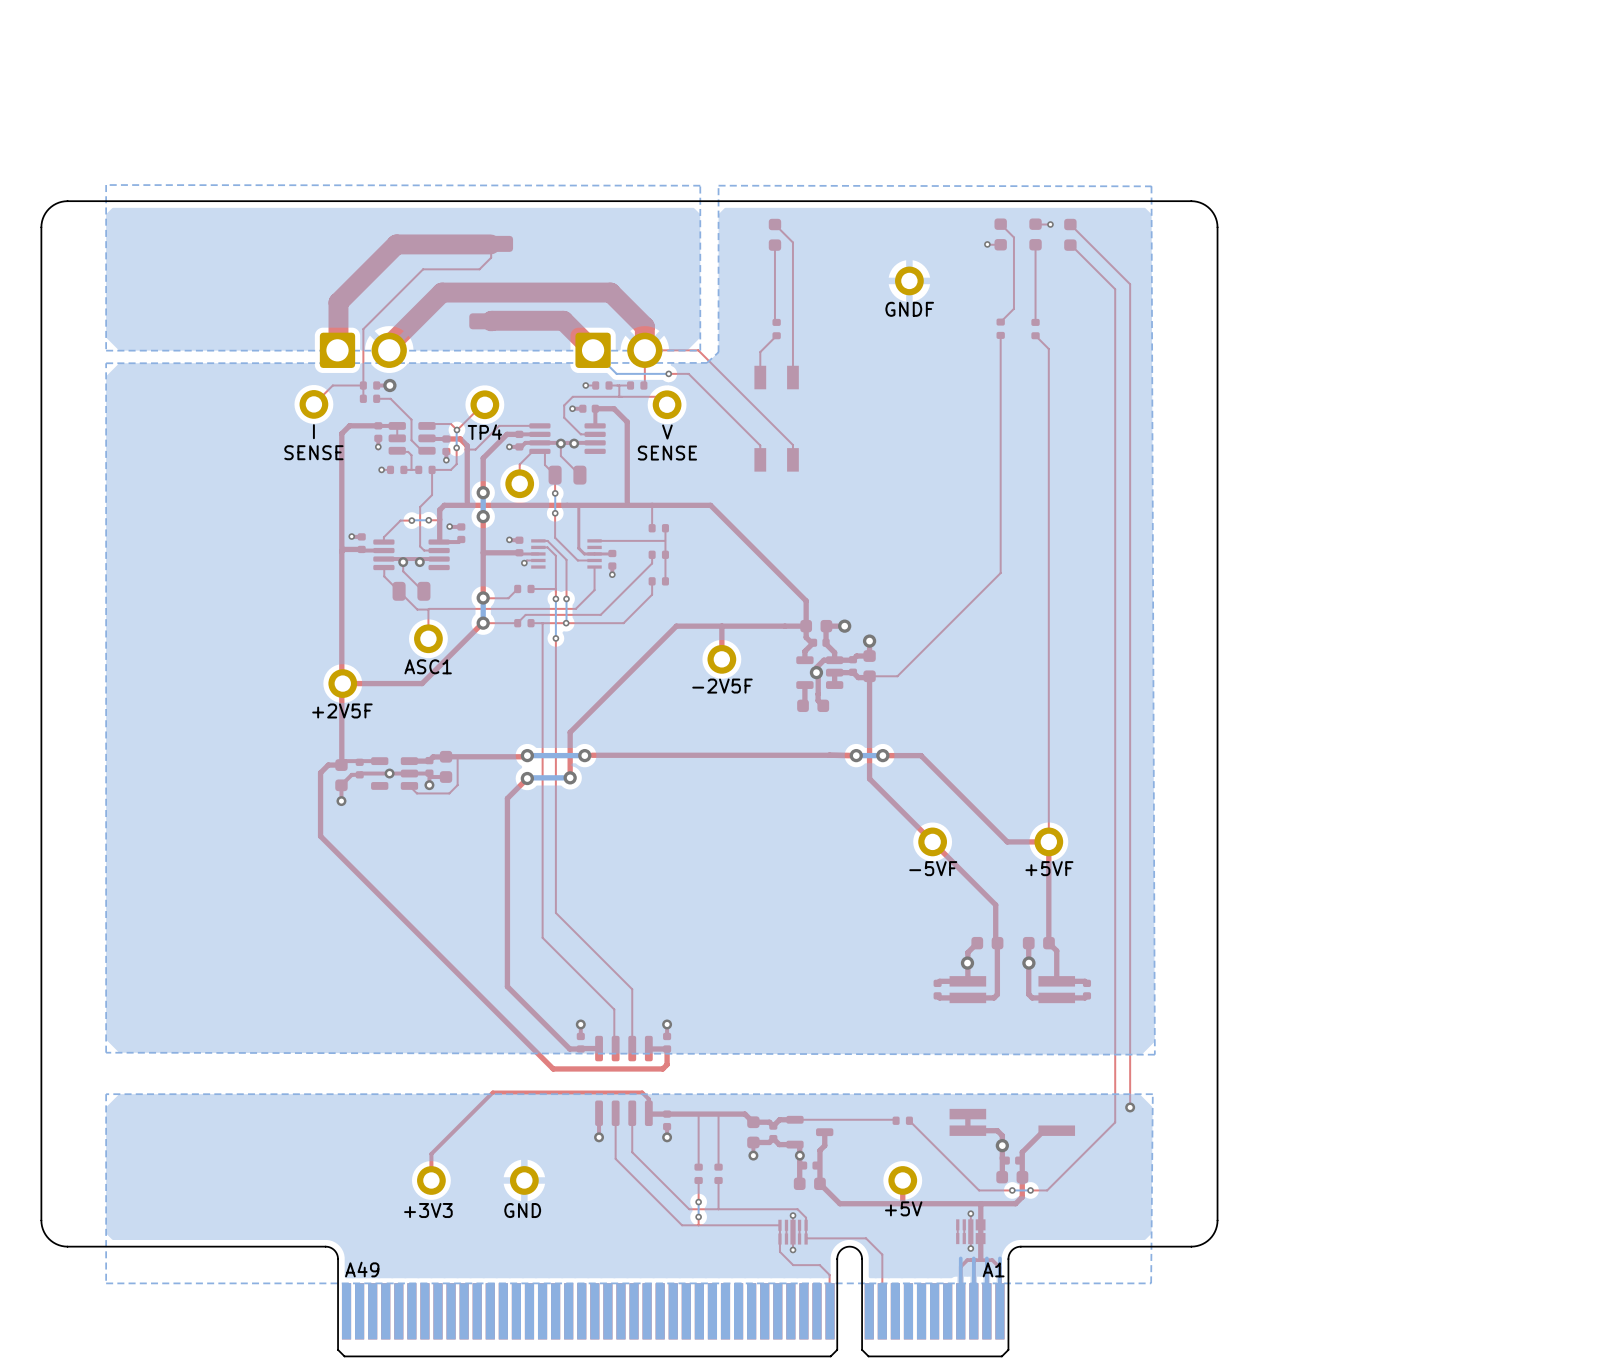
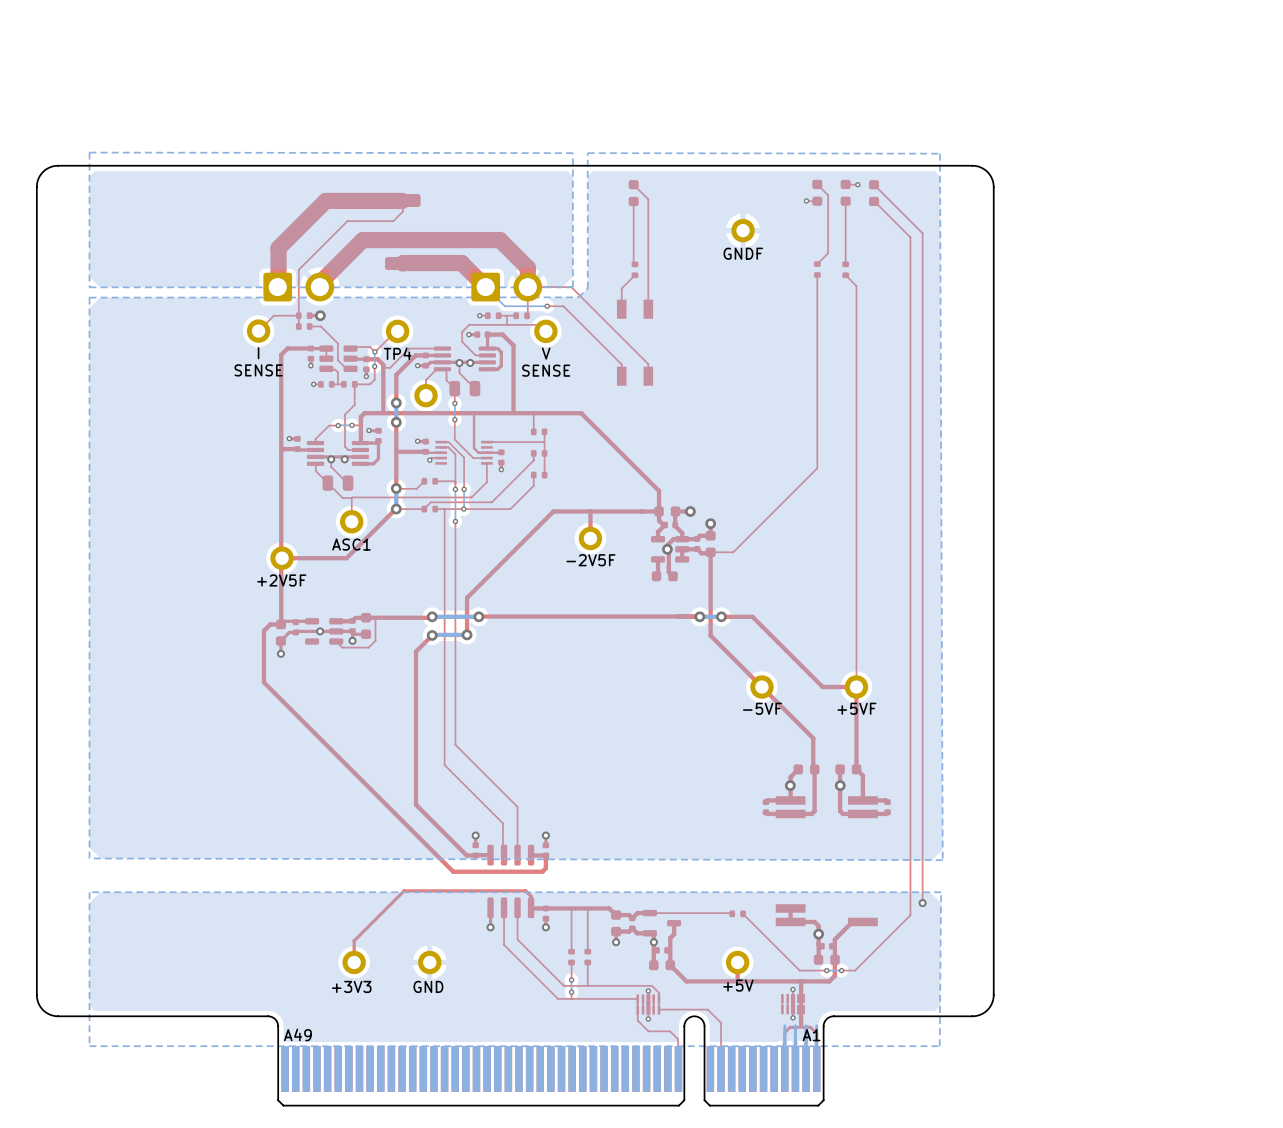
top track: none -> (487, 348) (497, 348) (501, 352) (501, 365) (497, 369) (487, 369)
top track: none -> (378, 440) (378, 458) (373, 463) (360, 463)

